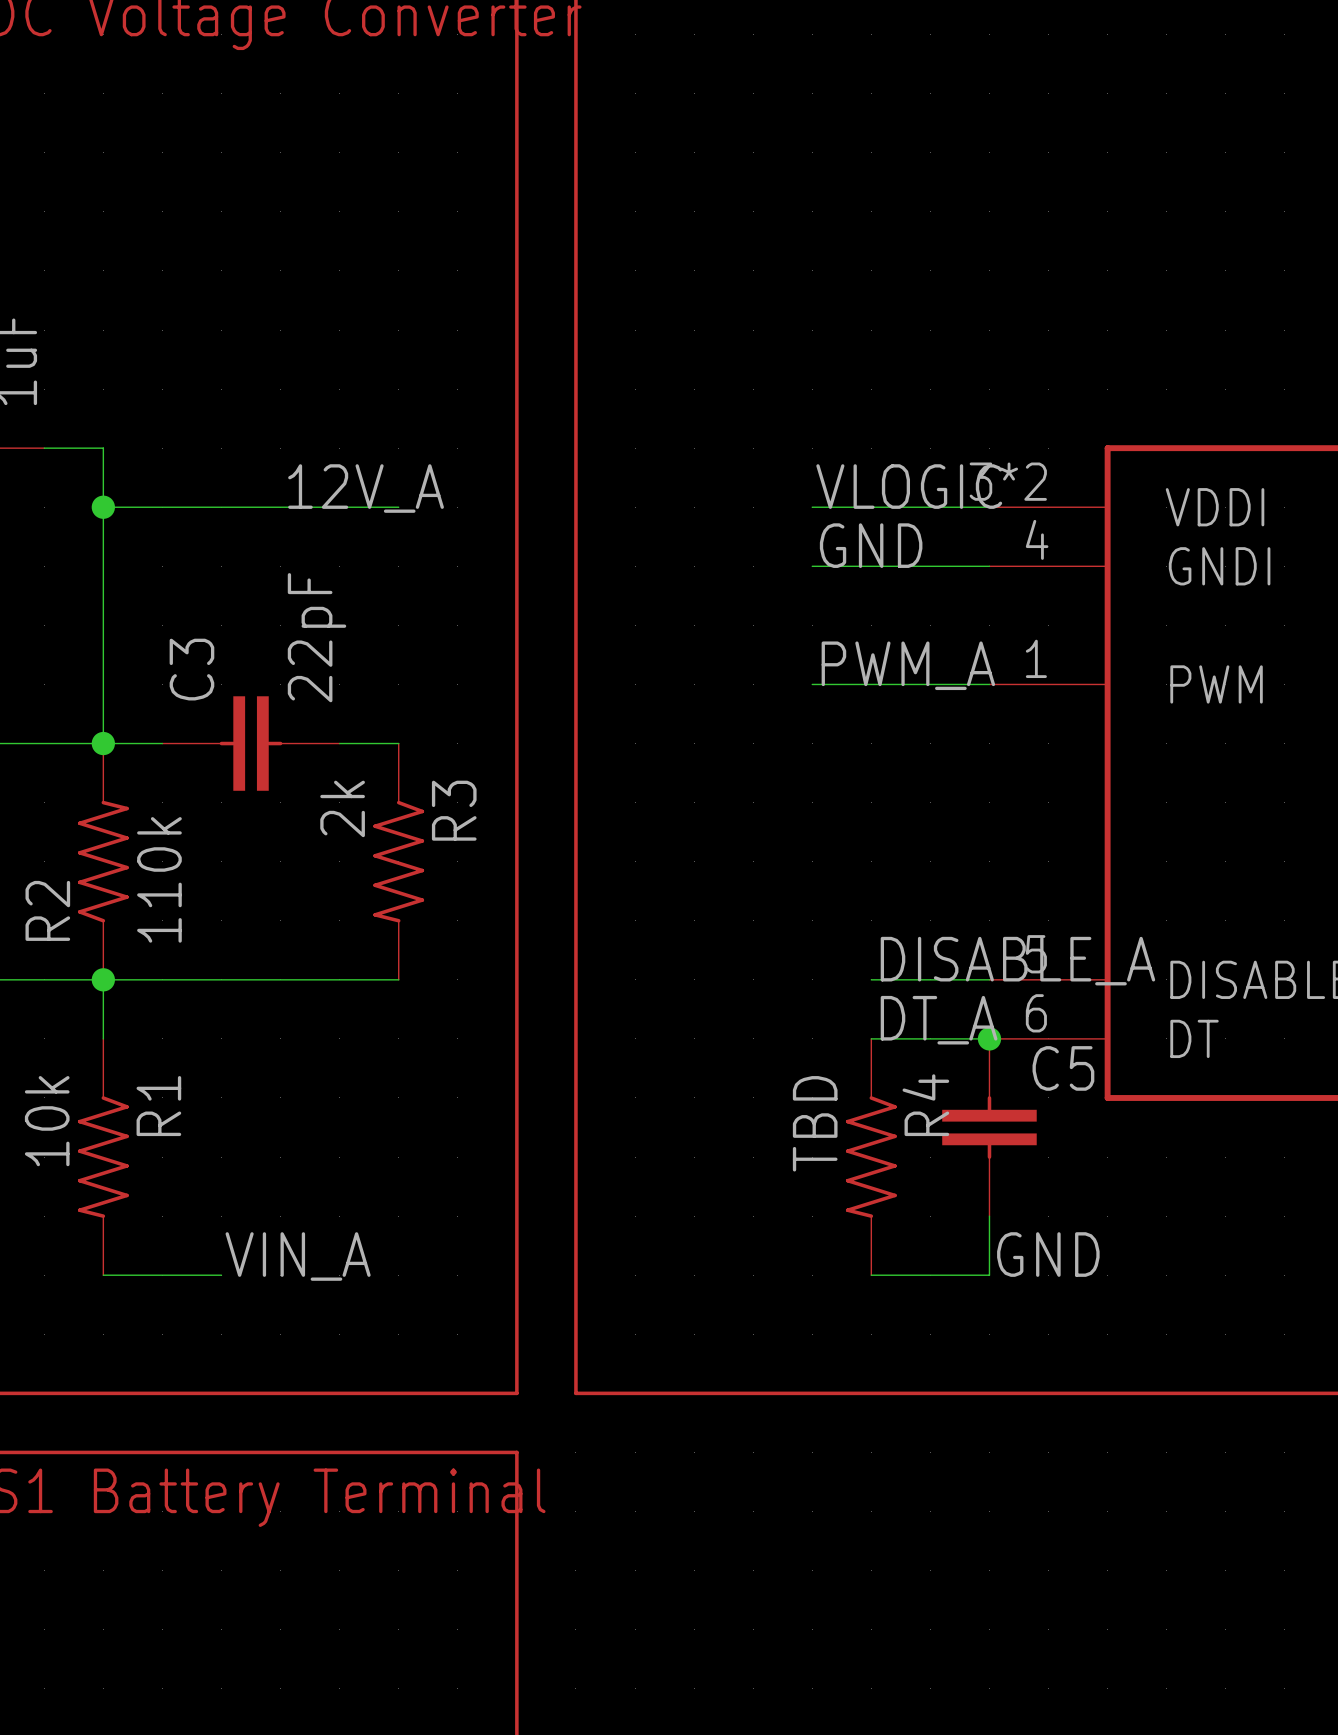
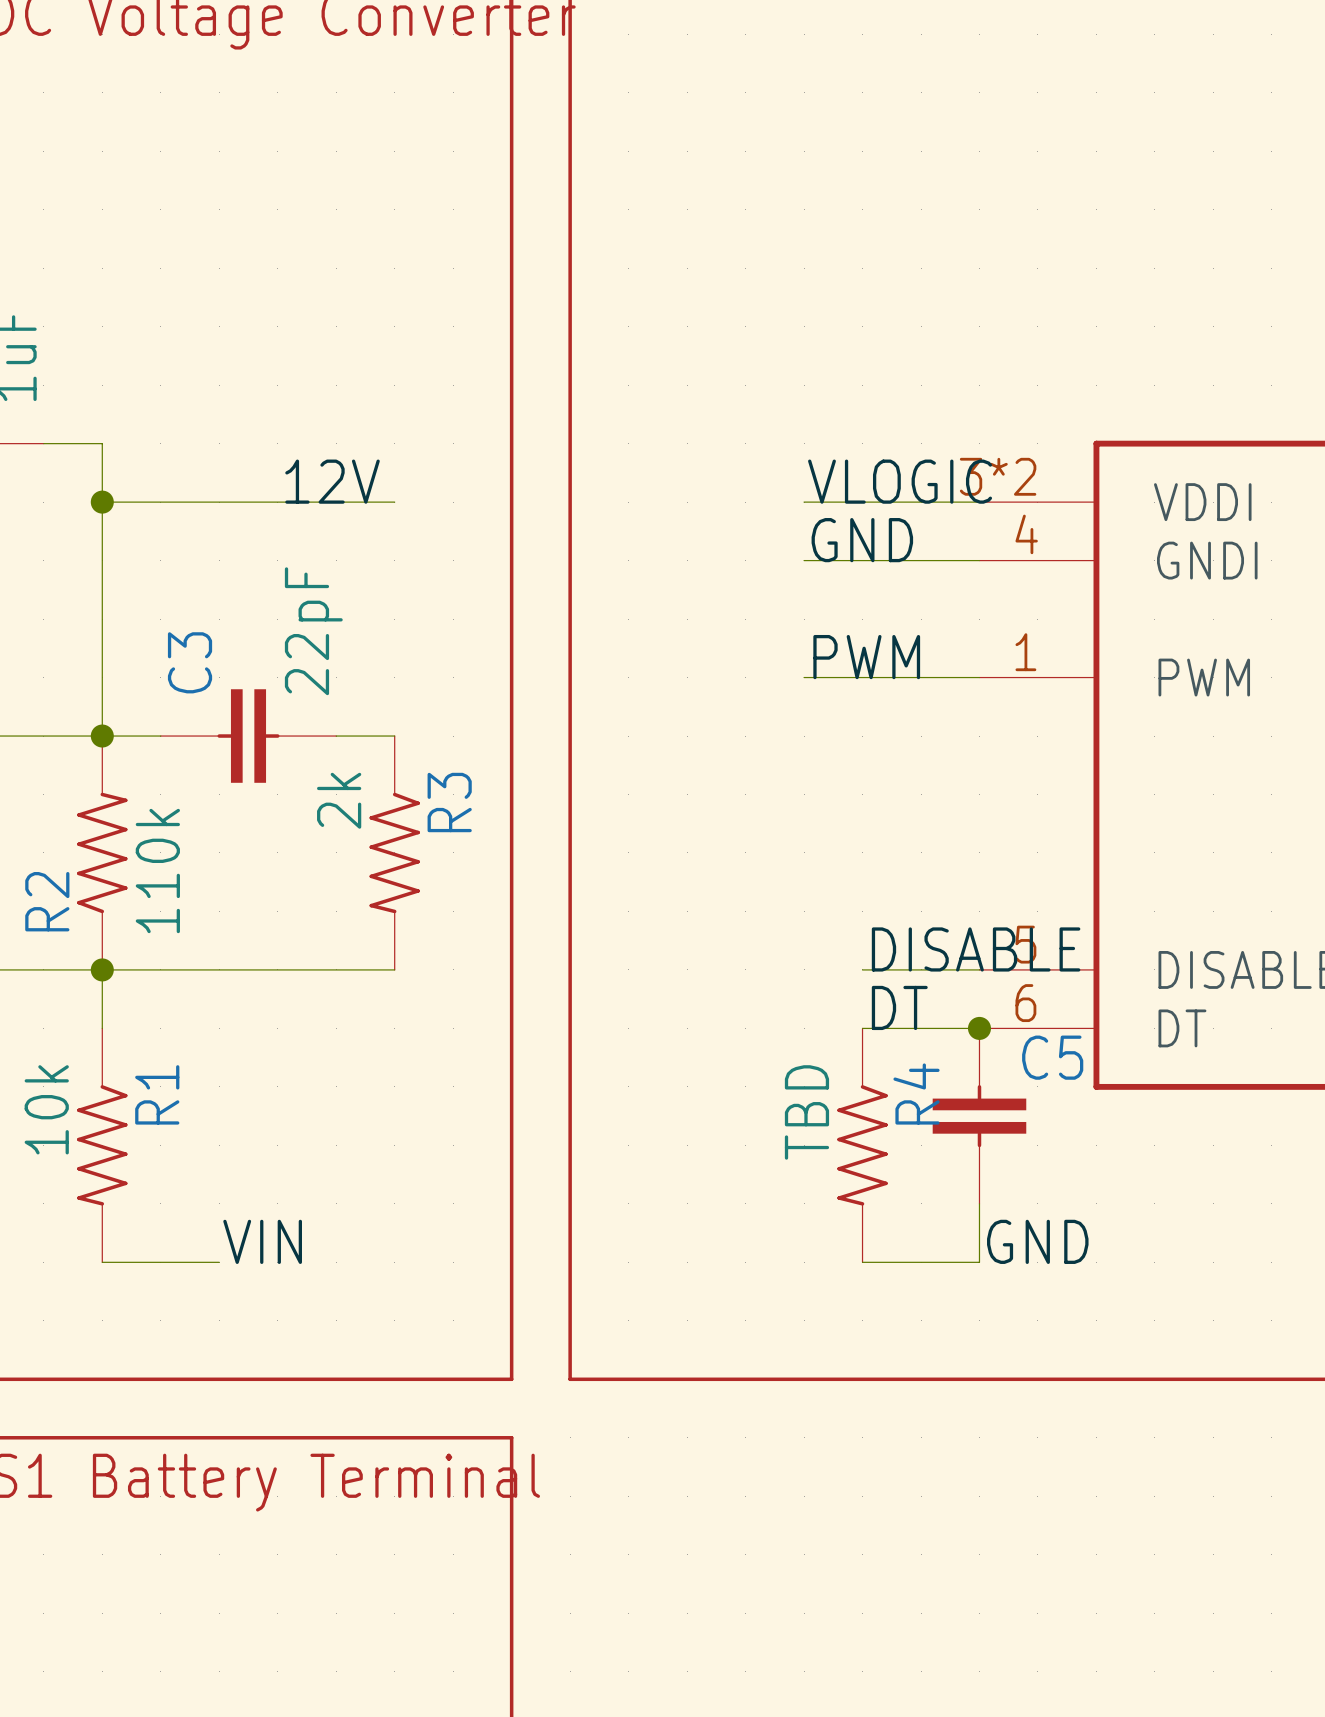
label: 12V_A (366, 488) -> 12V (332, 481)
label: PWM_A (908, 665) -> PWM (866, 657)
label: DISABLE_A (1017, 961) -> DISABLE (976, 949)
label: DT_A (939, 1020) -> DT (899, 1007)
label: VIN_A (298, 1256) -> VIN (262, 1241)

